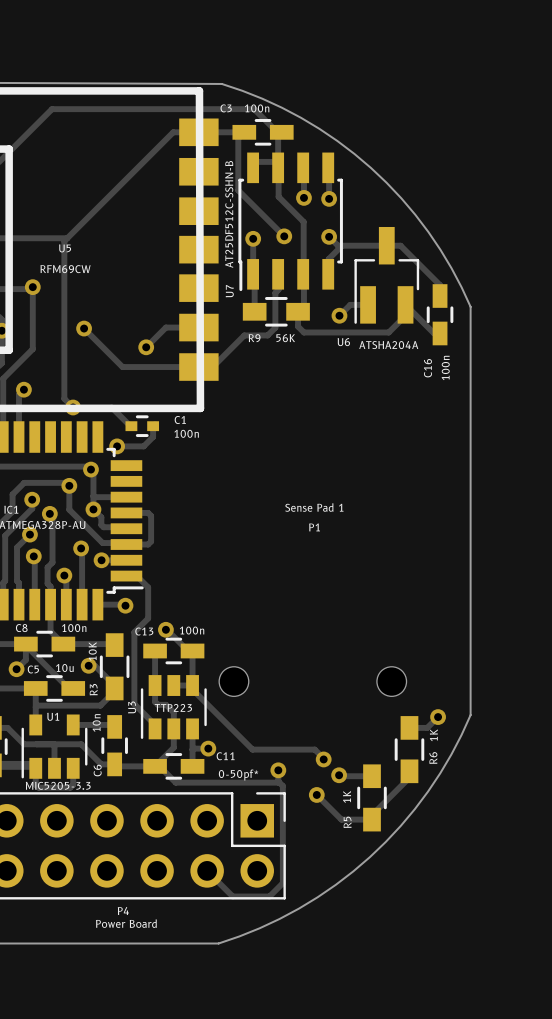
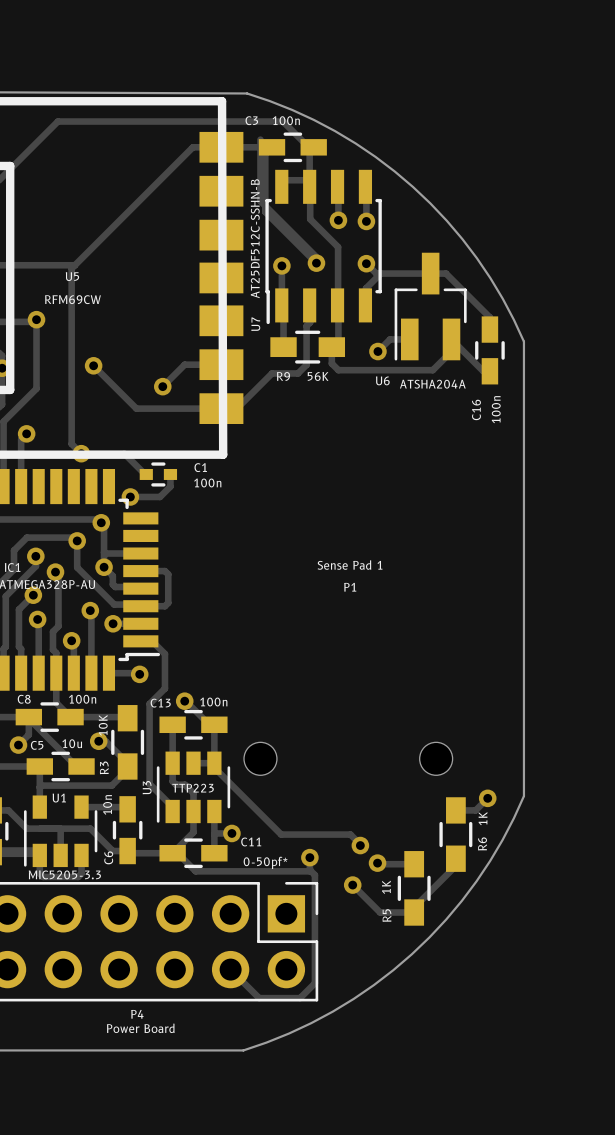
track: none -> (260, 139) (260, 201) (316, 257)

